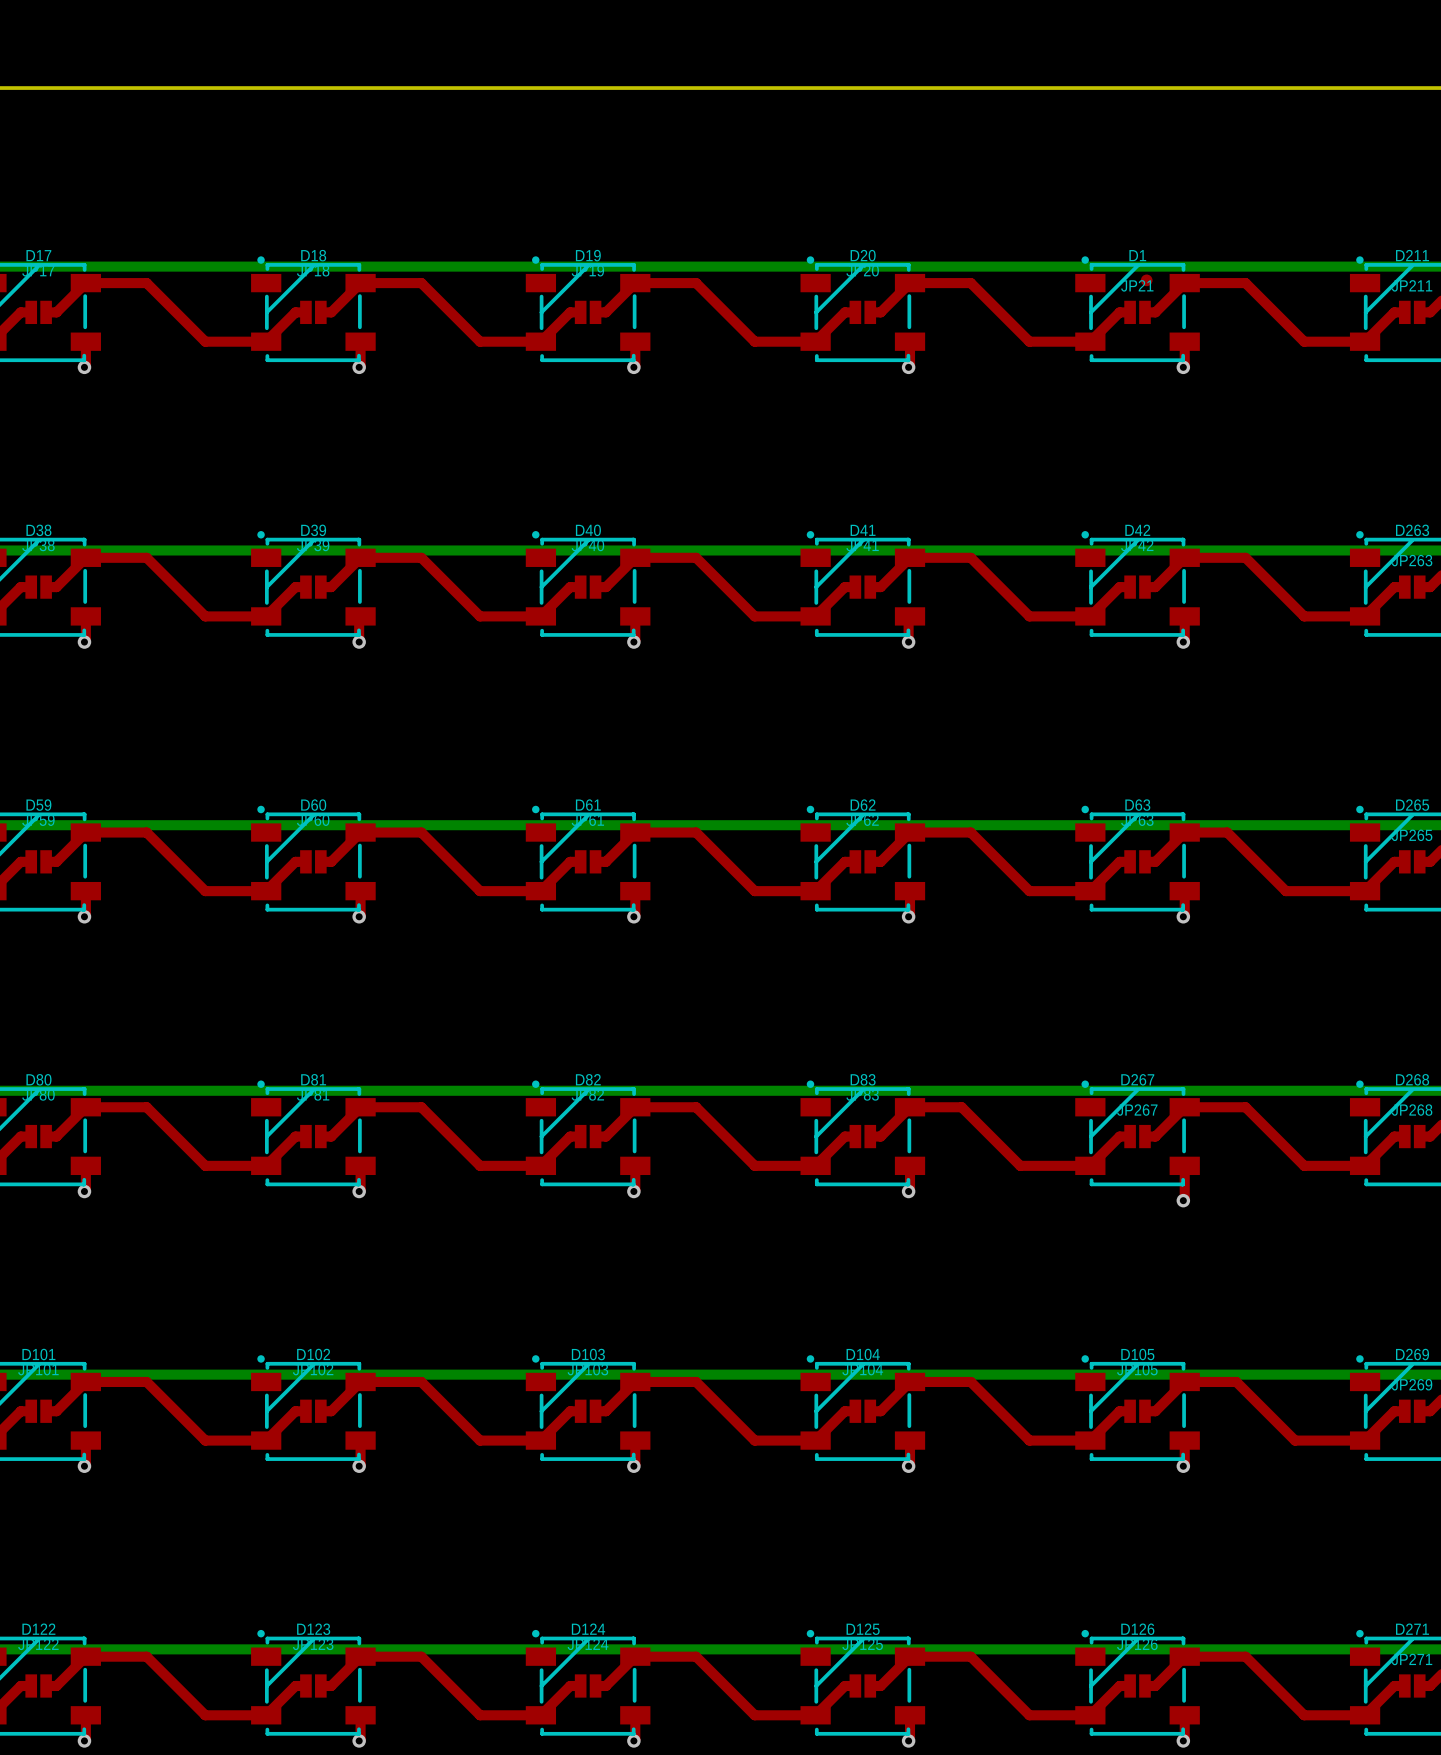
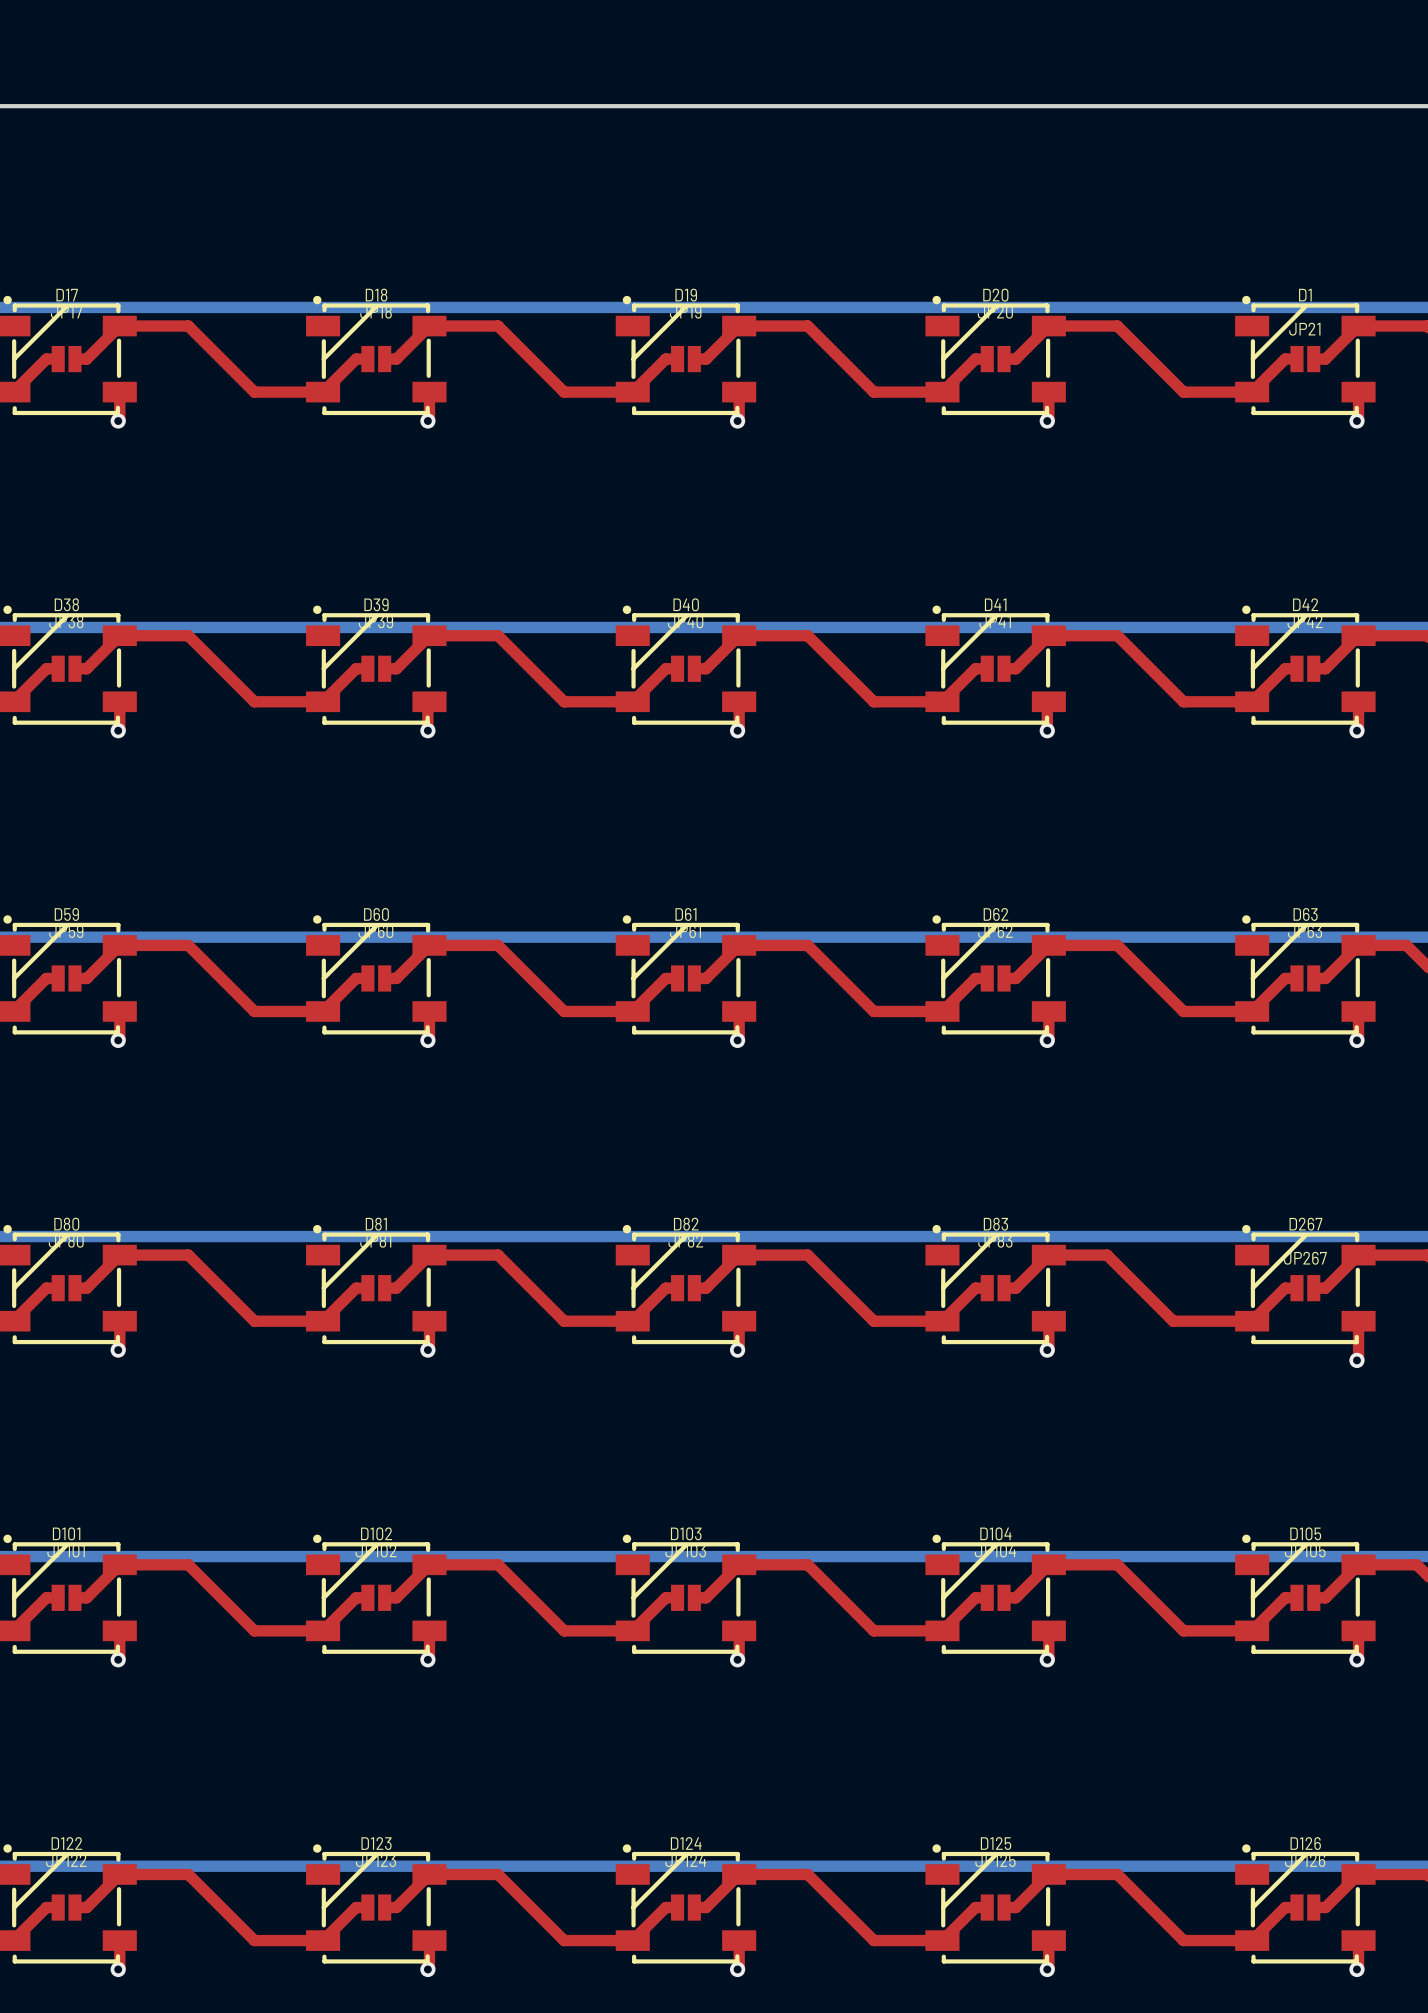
part: (1146, 280) -> none

